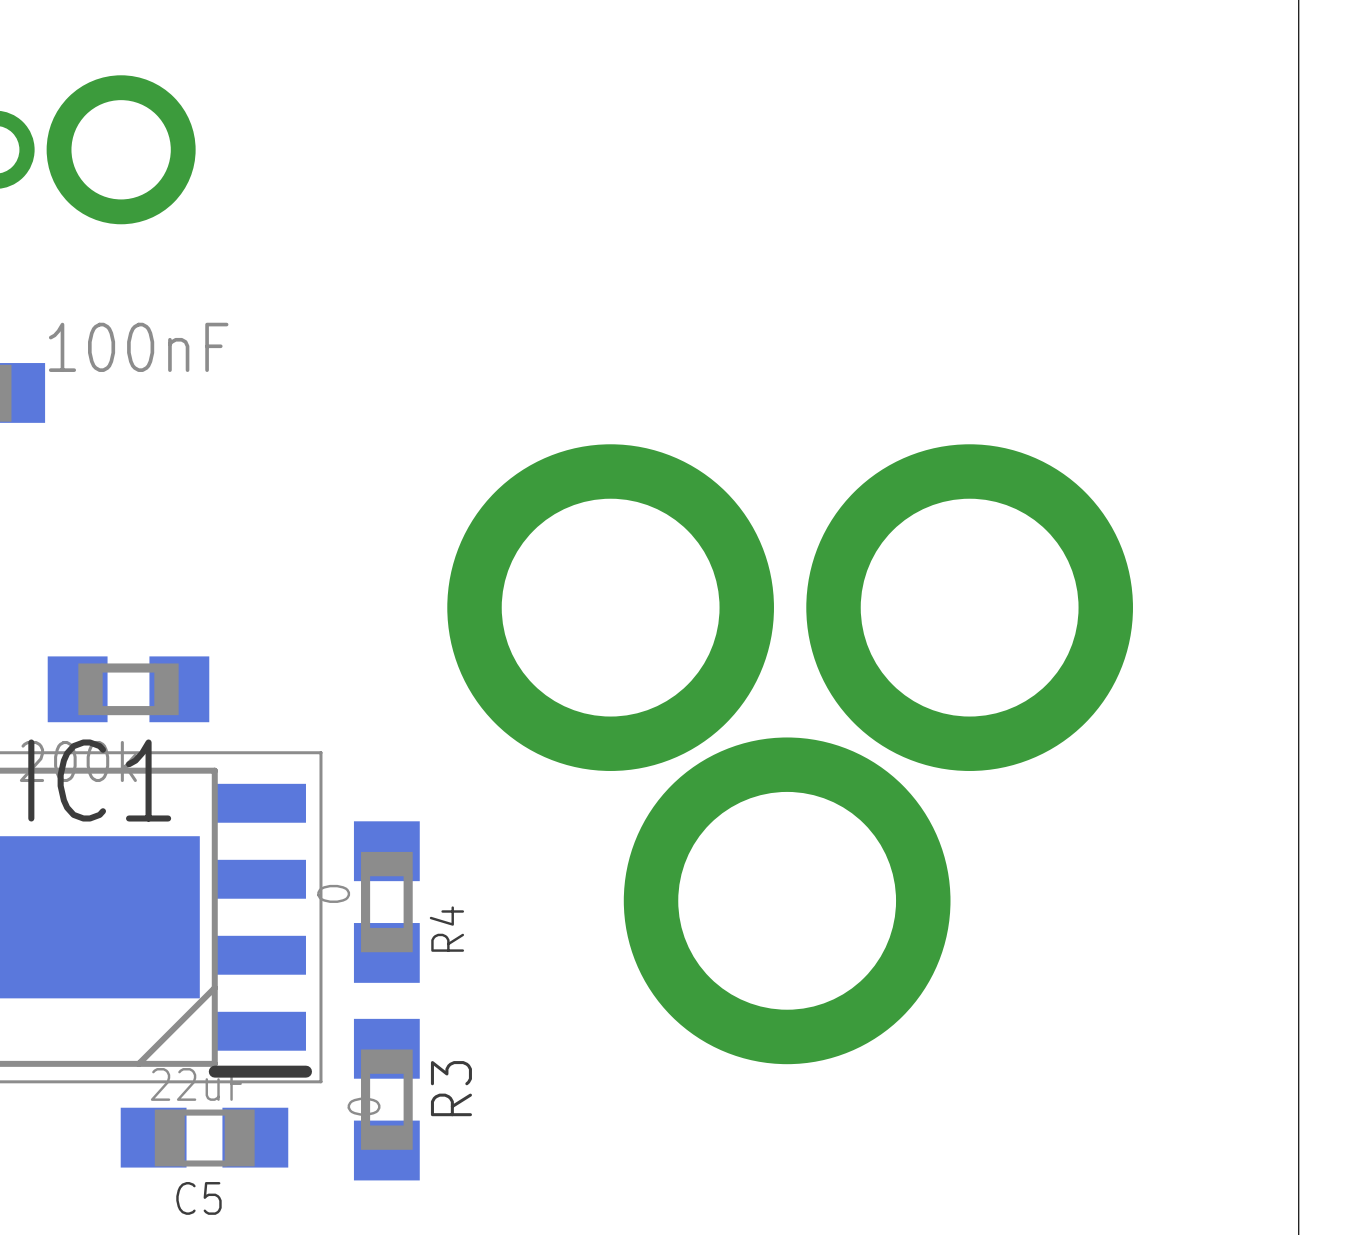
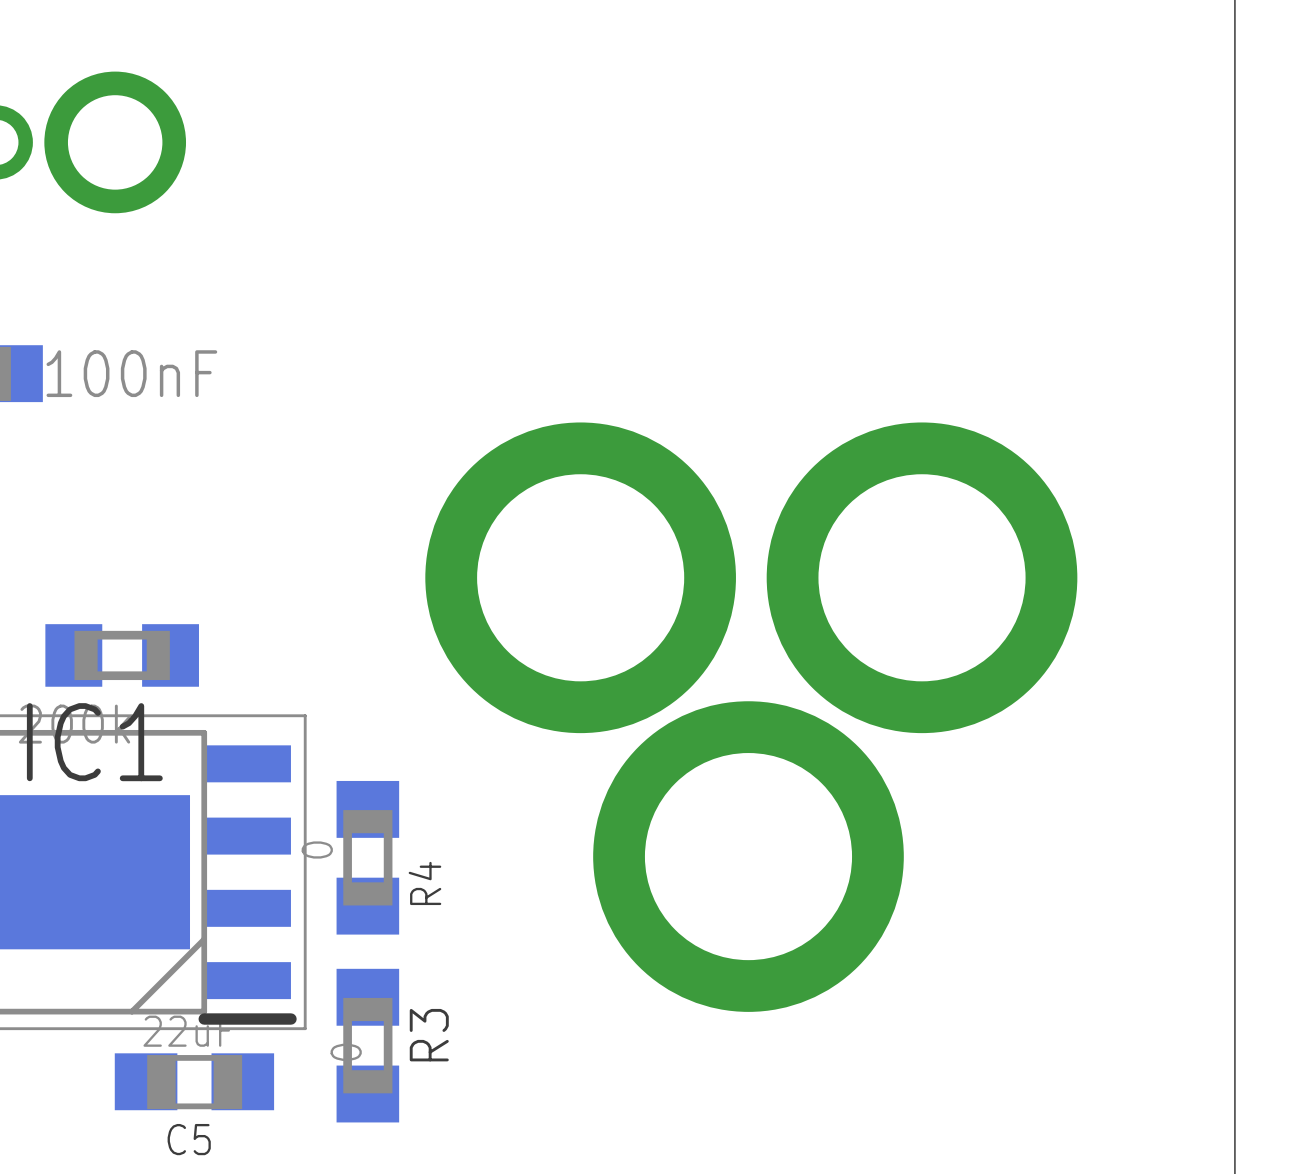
part value position: 100nF (138, 347) -> 100nF (131, 373)

